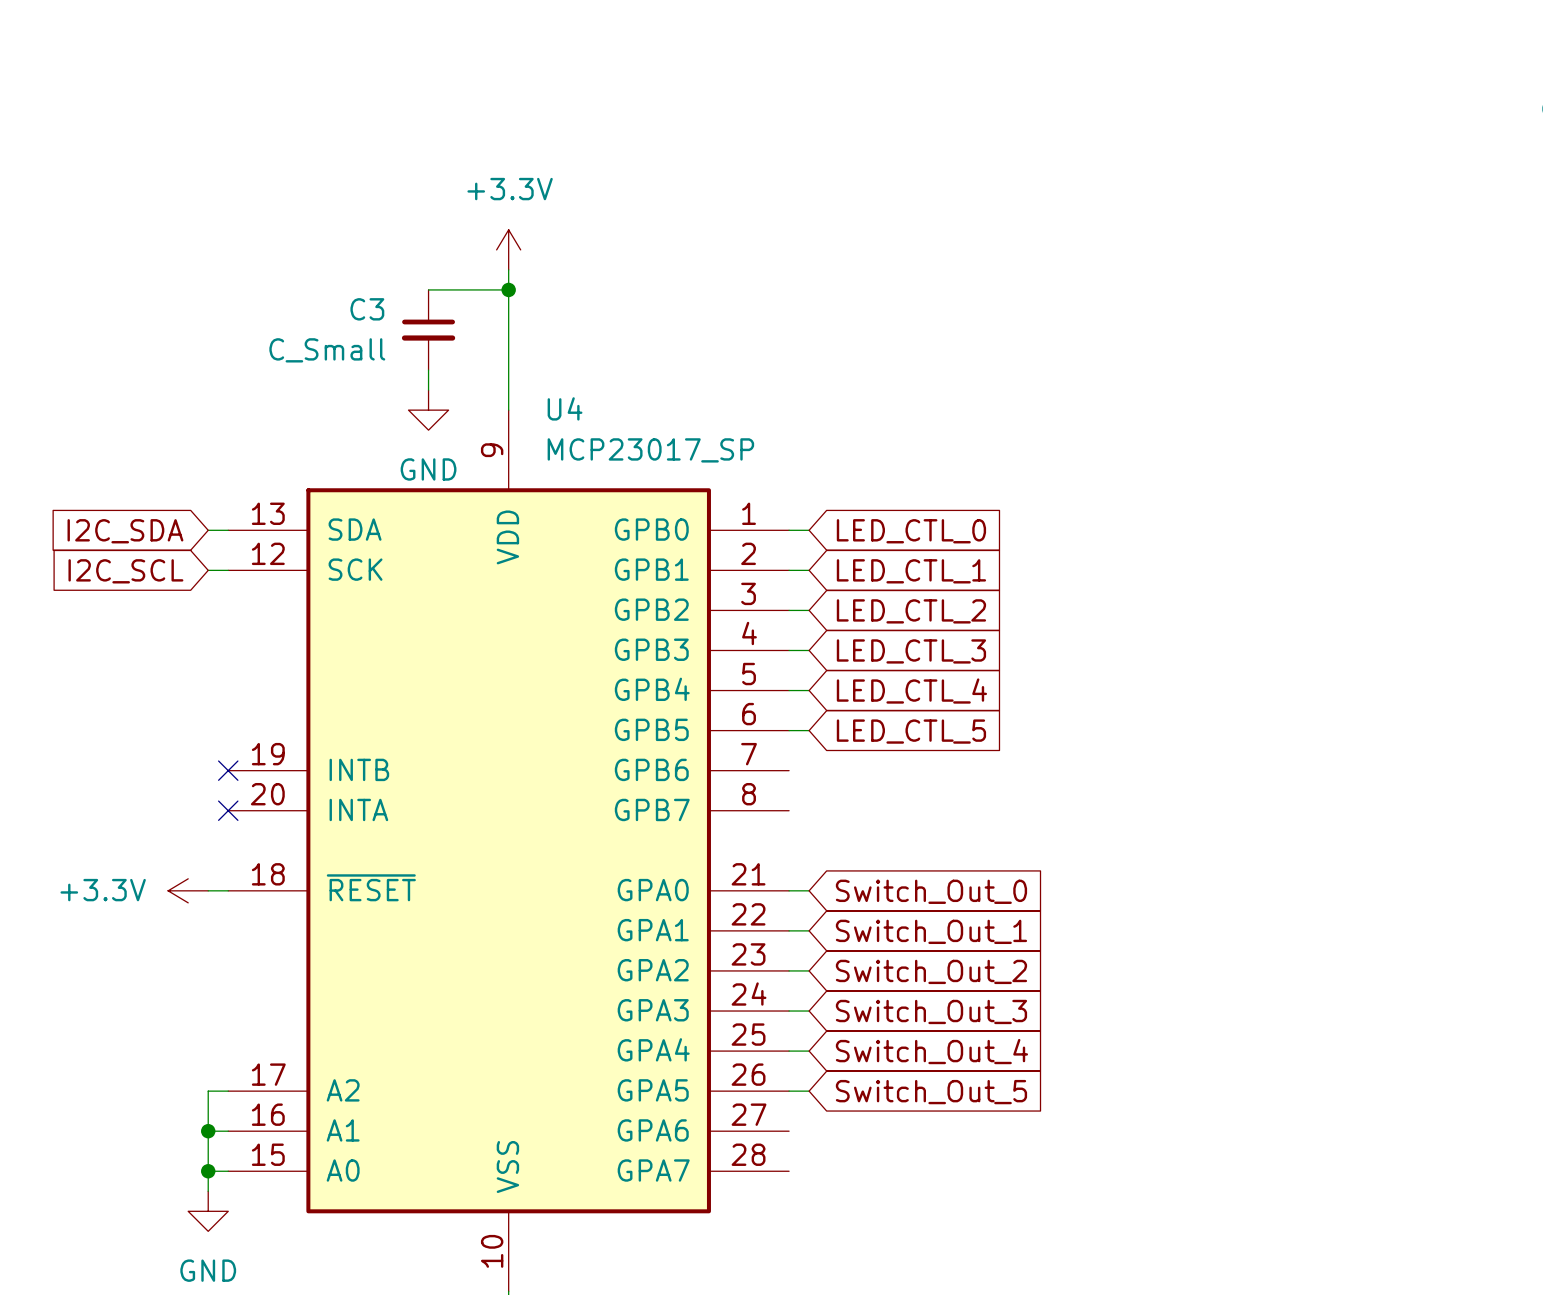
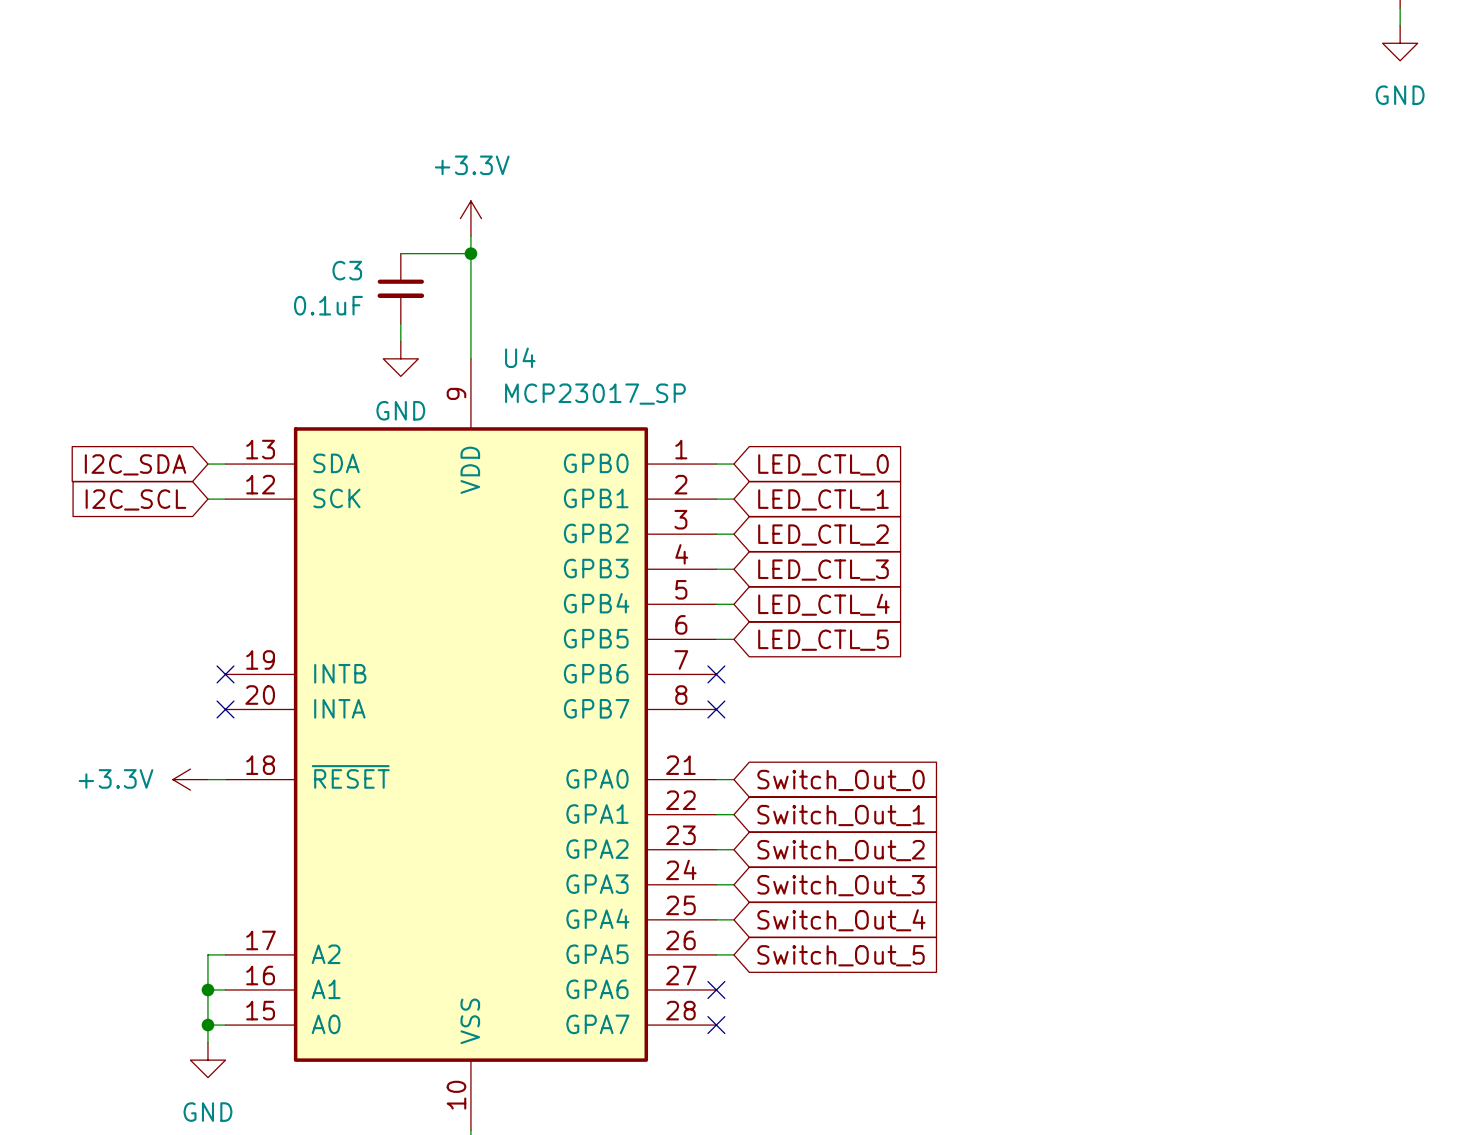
C3 value: C_Small (327, 350) -> 0.1uF (328, 305)
no-connect mark: none -> (716, 674)
no-connect mark: none -> (716, 709)
no-connect mark: none -> (716, 989)
no-connect mark: none -> (716, 1025)

